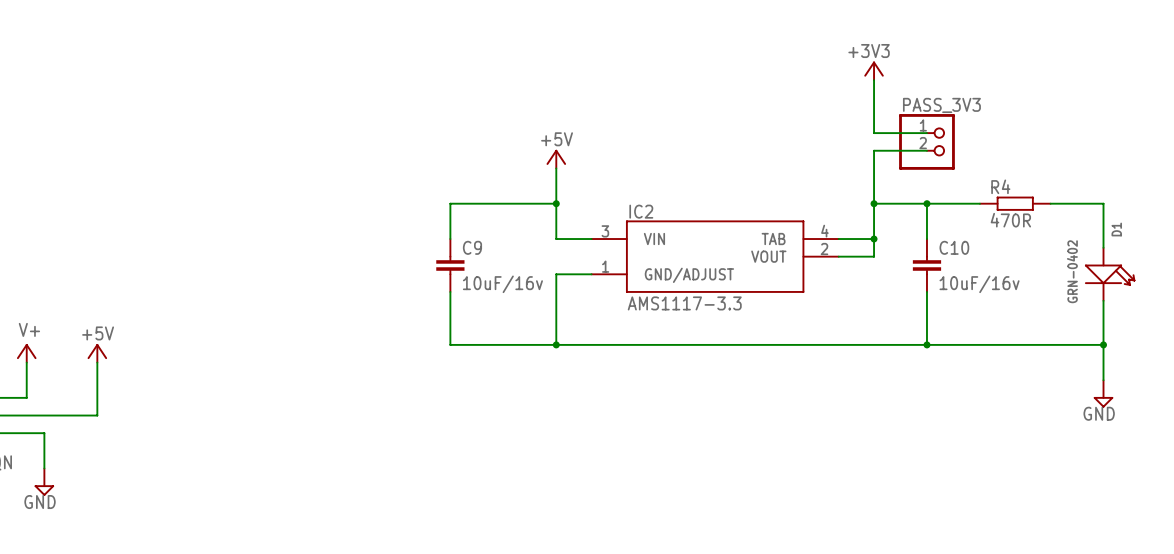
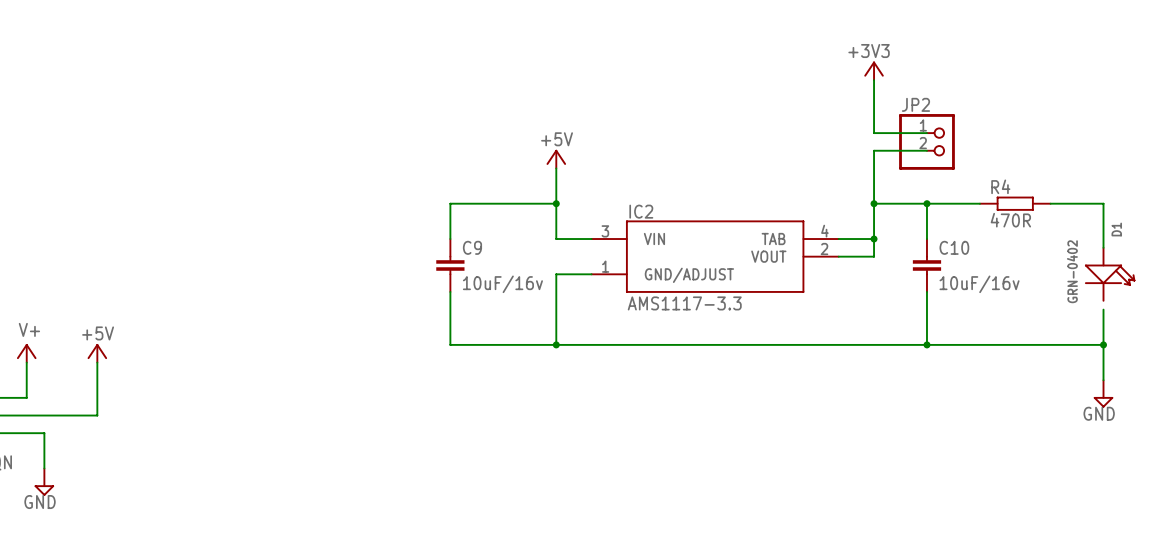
PASS_3V3 name: PASS_3V3 (941, 105) -> JP2 (915, 104)
wire: (1103, 300) (1103, 309) -> none

